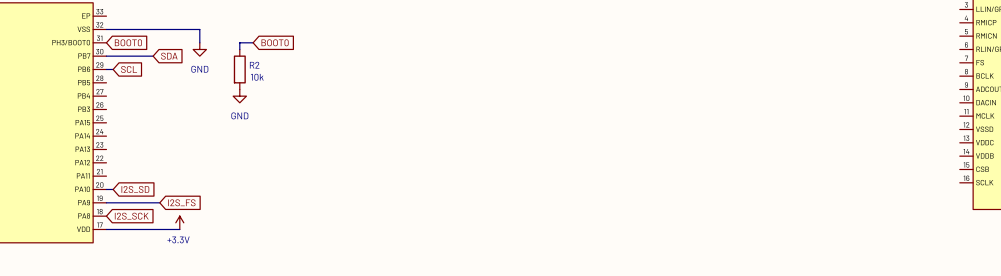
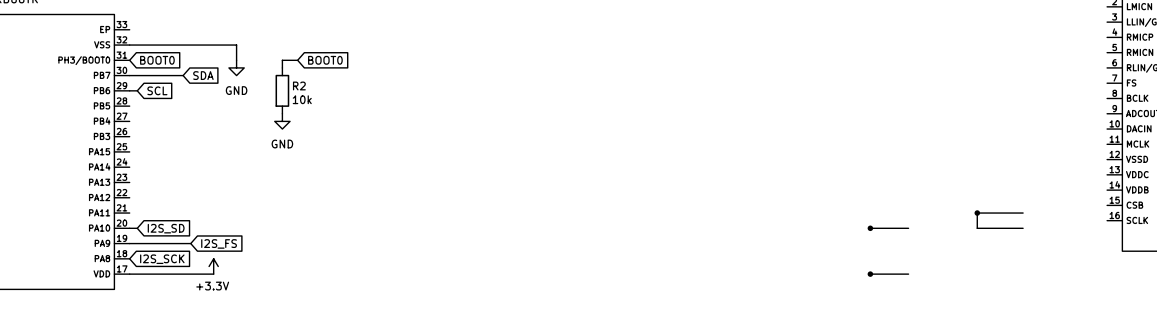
junction: none -> (977, 213)
wire: none -> (1023, 213) (977, 213) (977, 228) (1023, 228)
wire: none -> (870, 228) (908, 228)
junction: none -> (870, 228)
wire: none -> (870, 274) (908, 274)
junction: none -> (870, 274)

